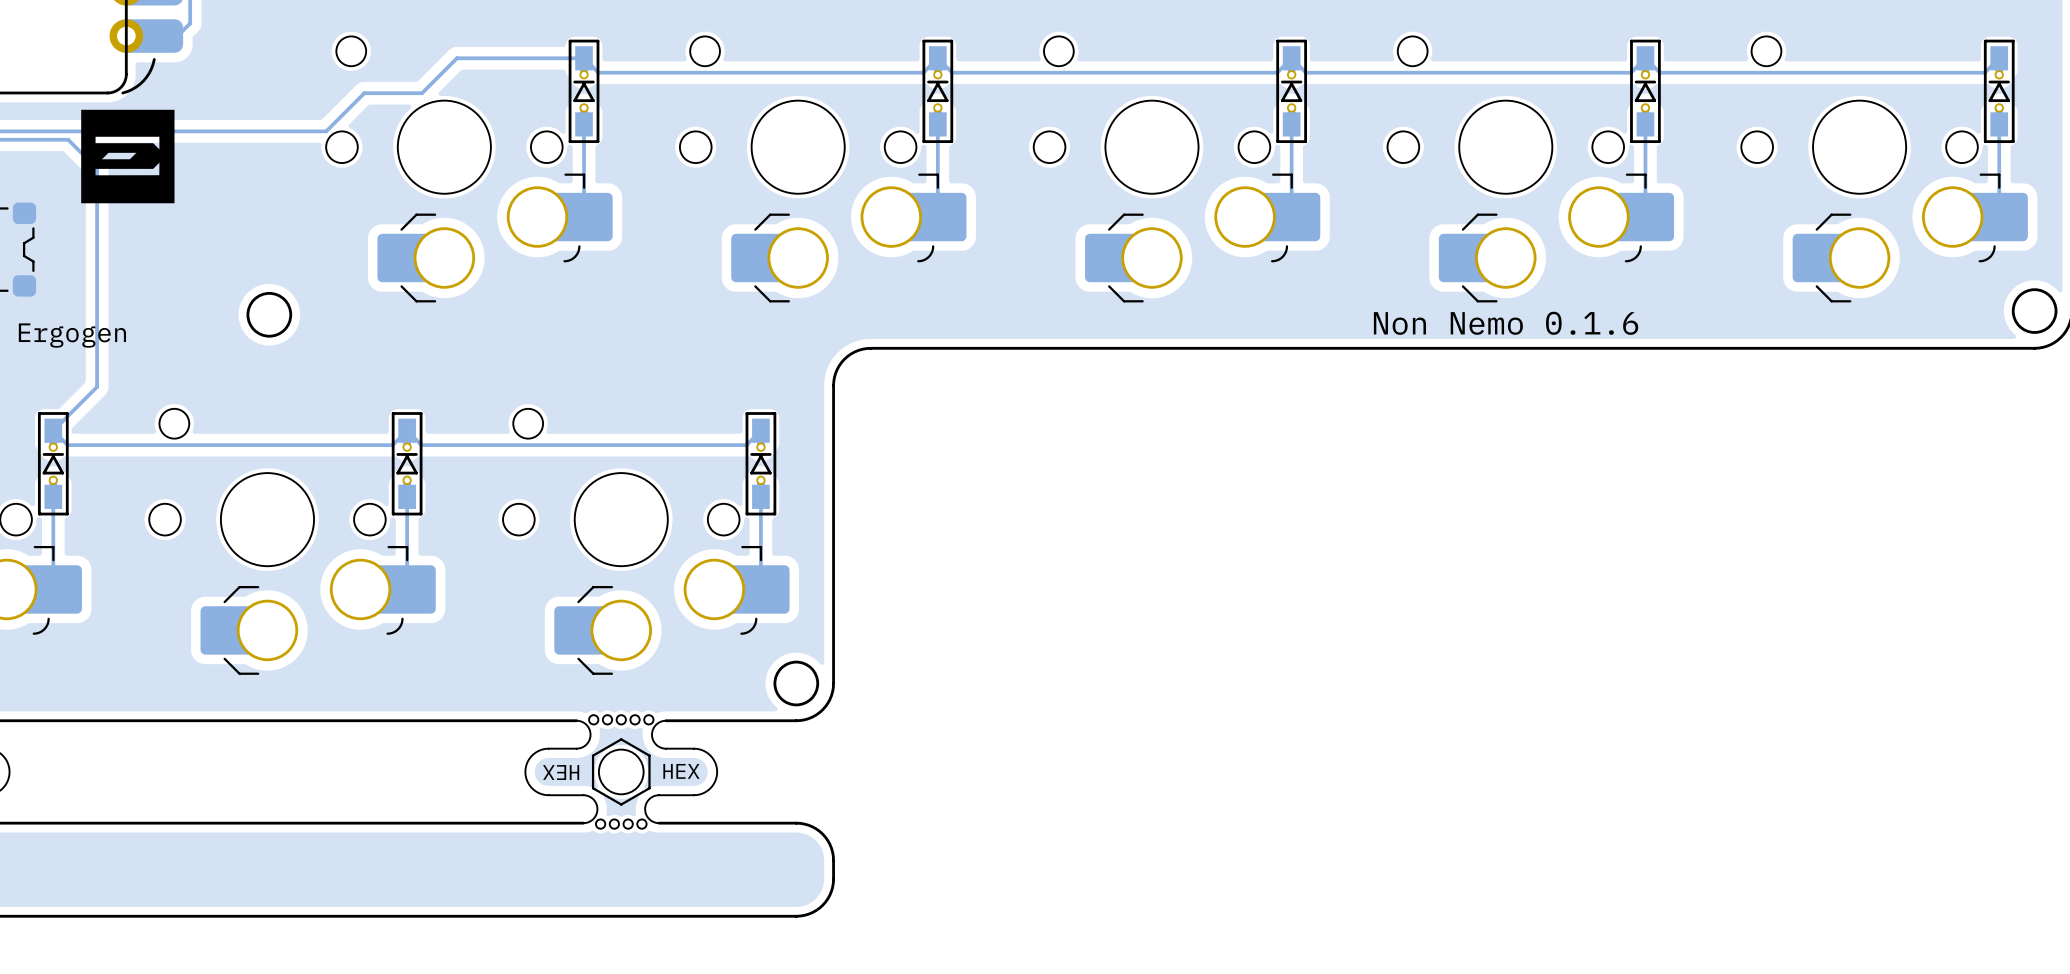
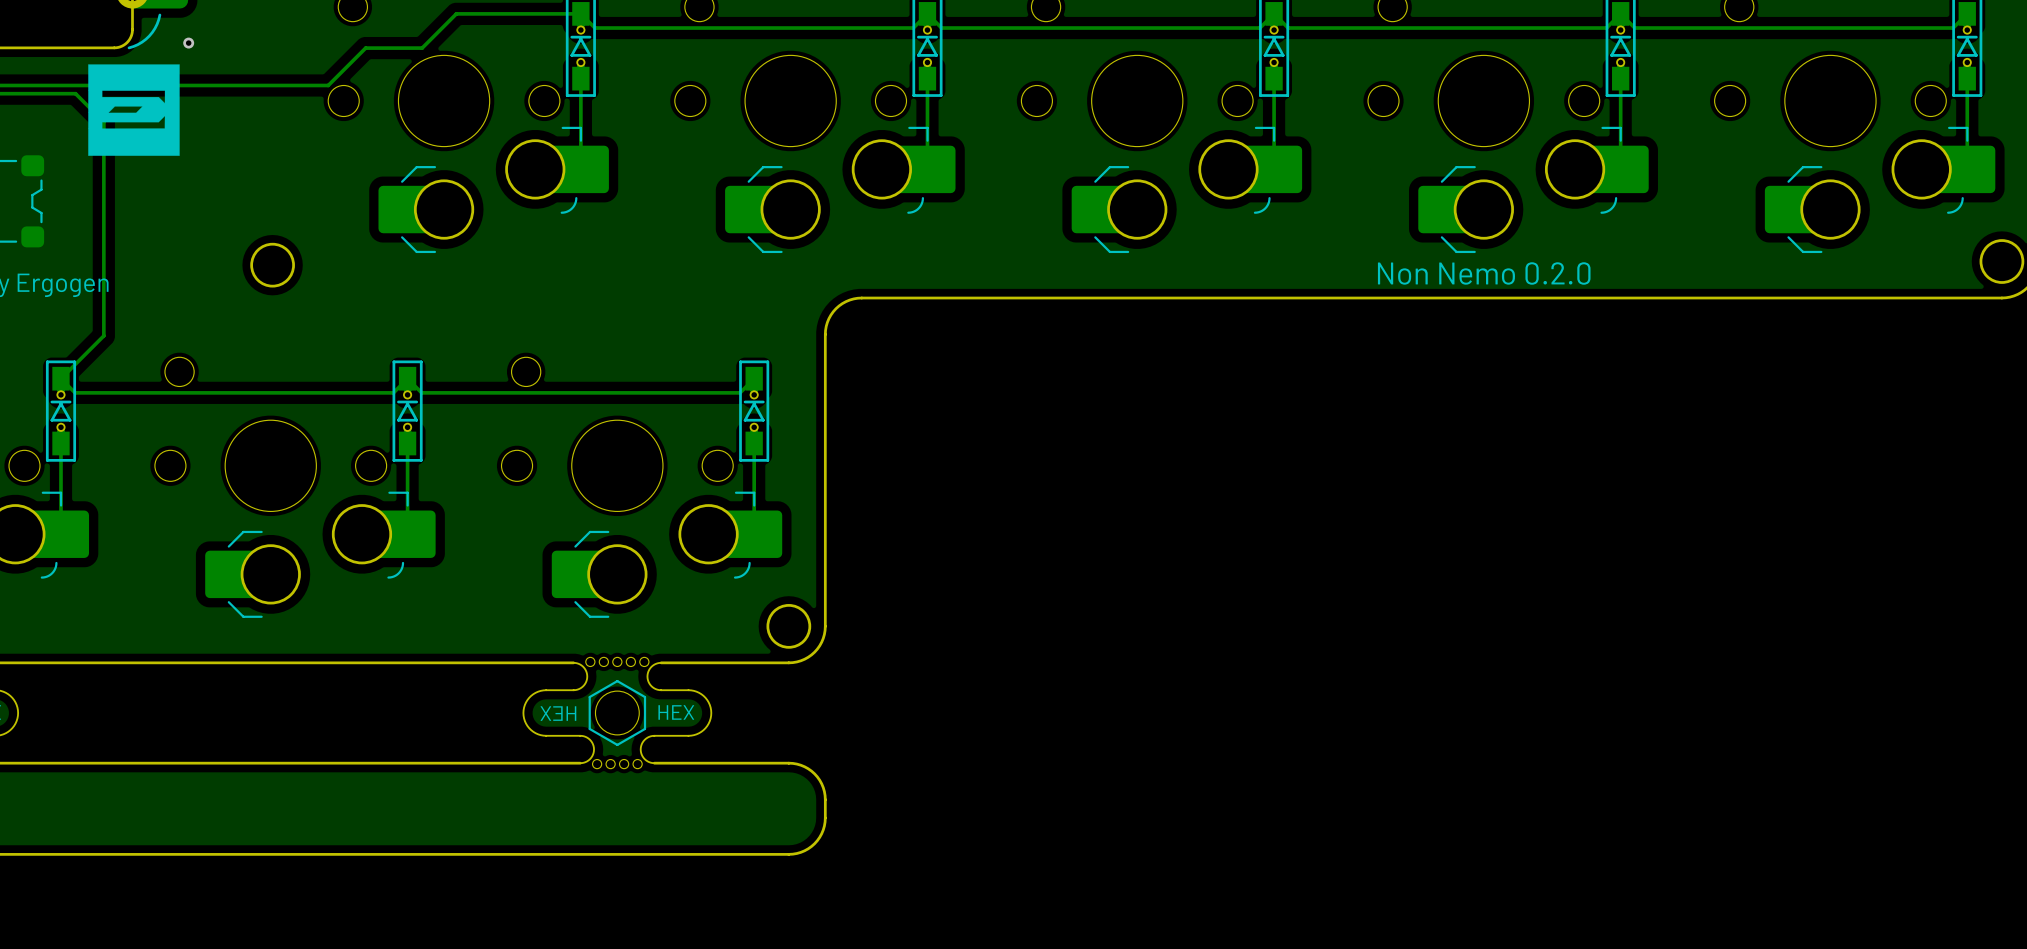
via: none -> (188, 43)
text: Non Nemo 0.1.6 (1506, 323) -> Non Nemo 0.2.0 (1484, 273)

